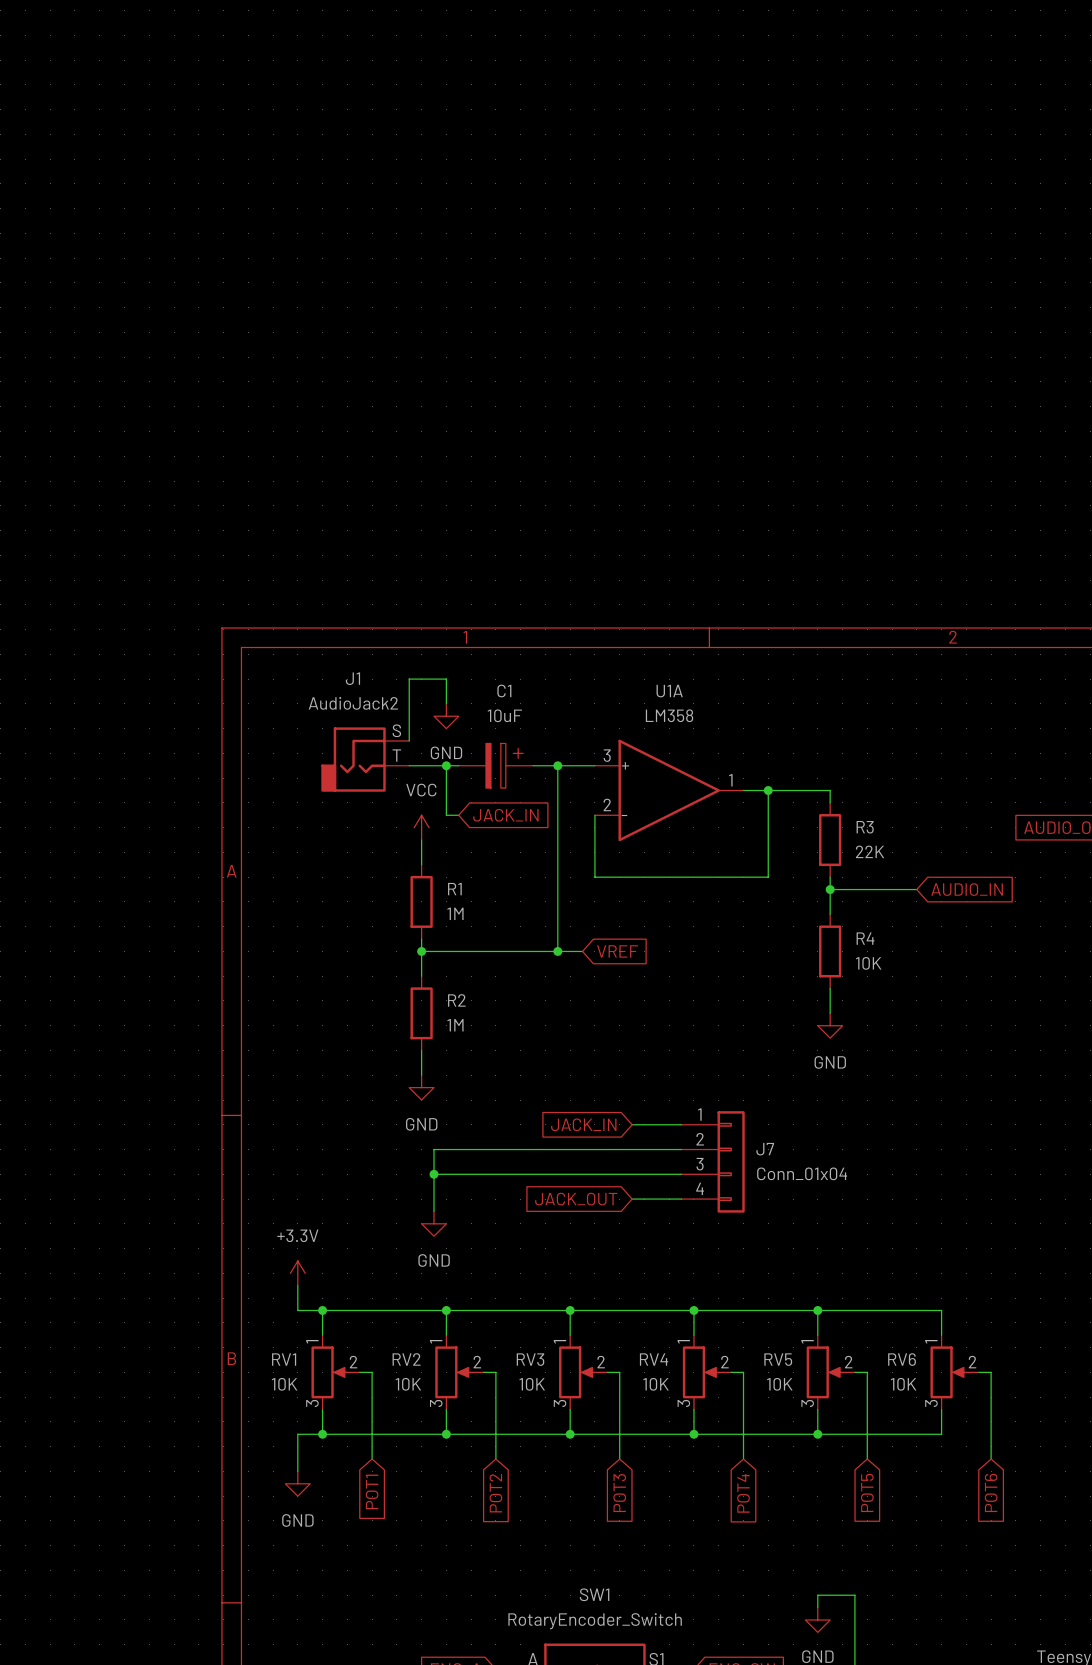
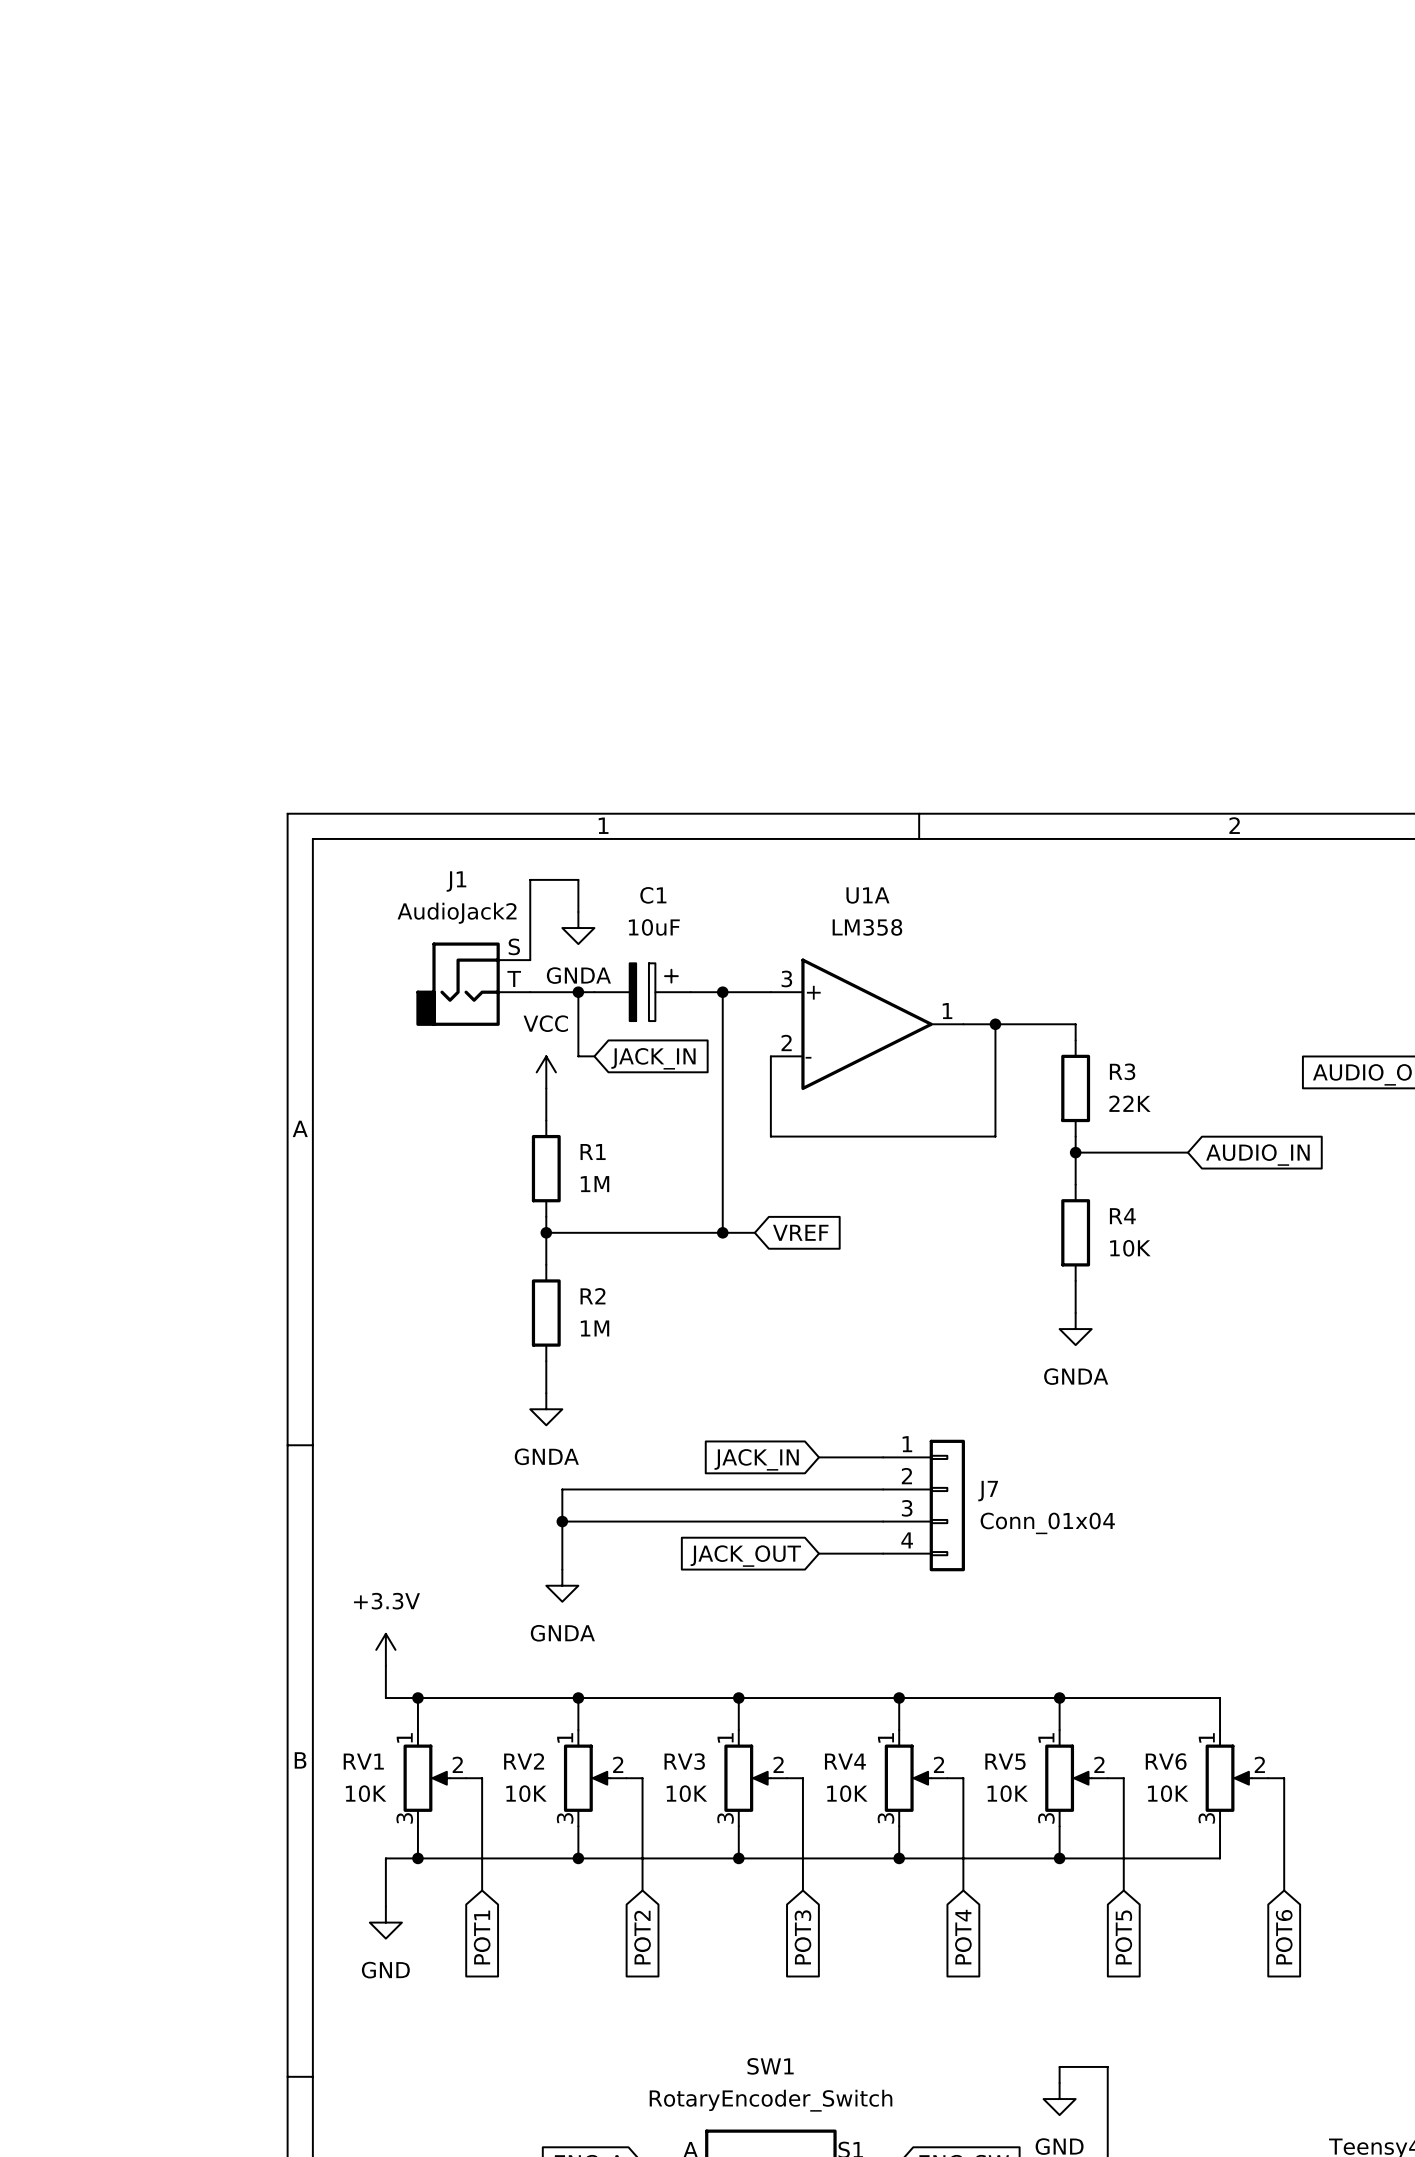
power symbol: GND (446, 716) -> GNDA (578, 928)
power symbol: GND (830, 1025) -> GNDA (1075, 1329)
power symbol: GND (421, 1087) -> GNDA (546, 1409)
power symbol: GND (434, 1223) -> GNDA (562, 1585)

